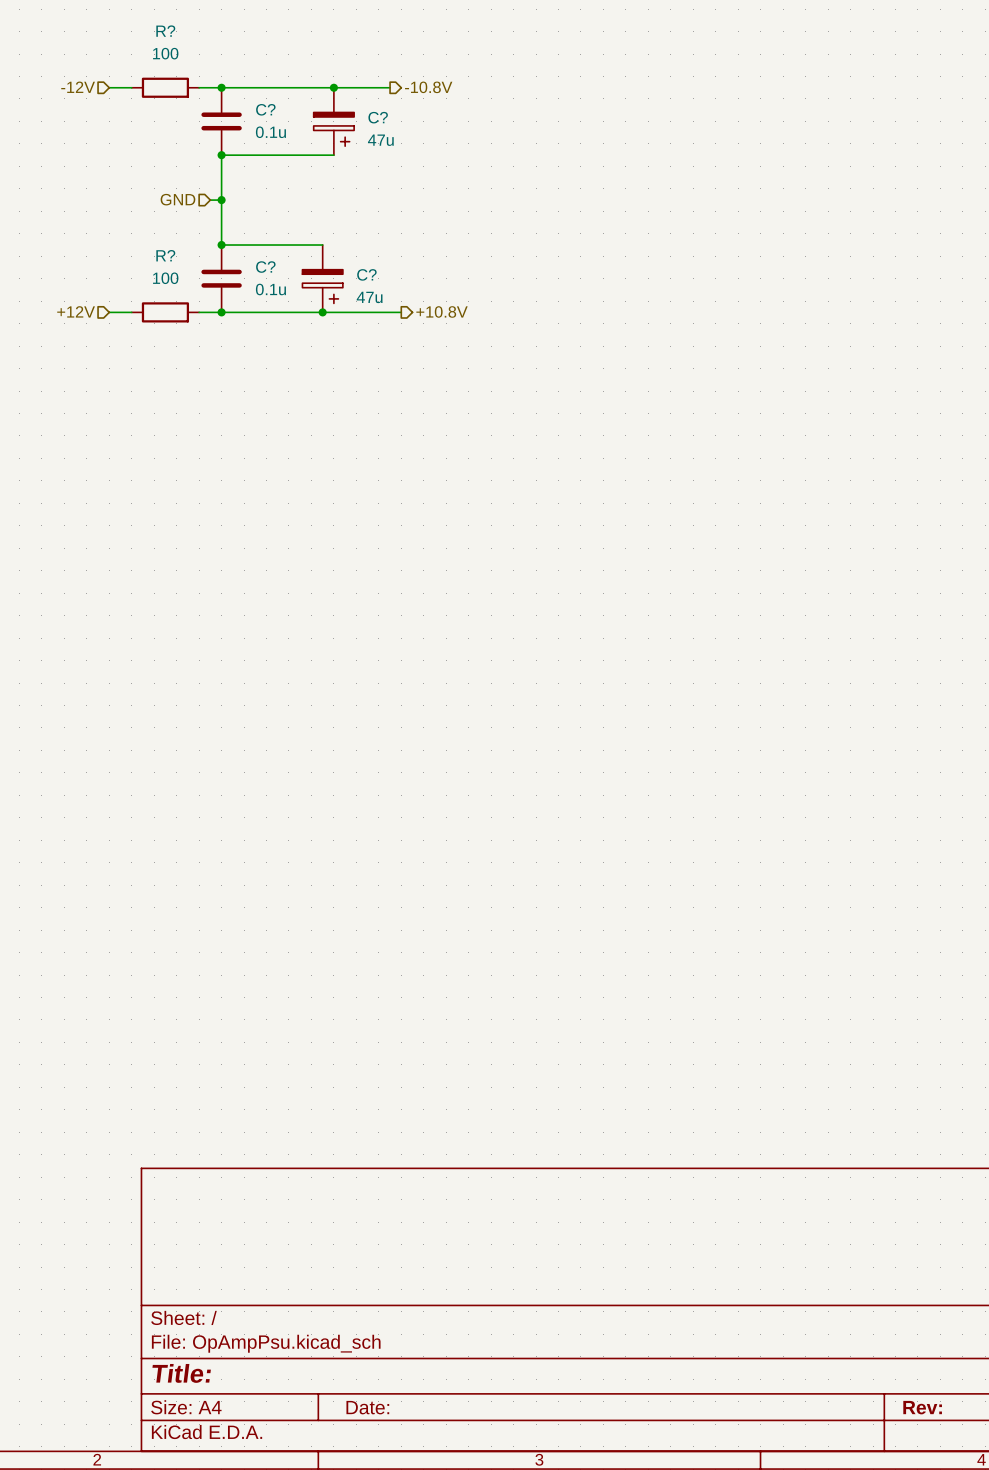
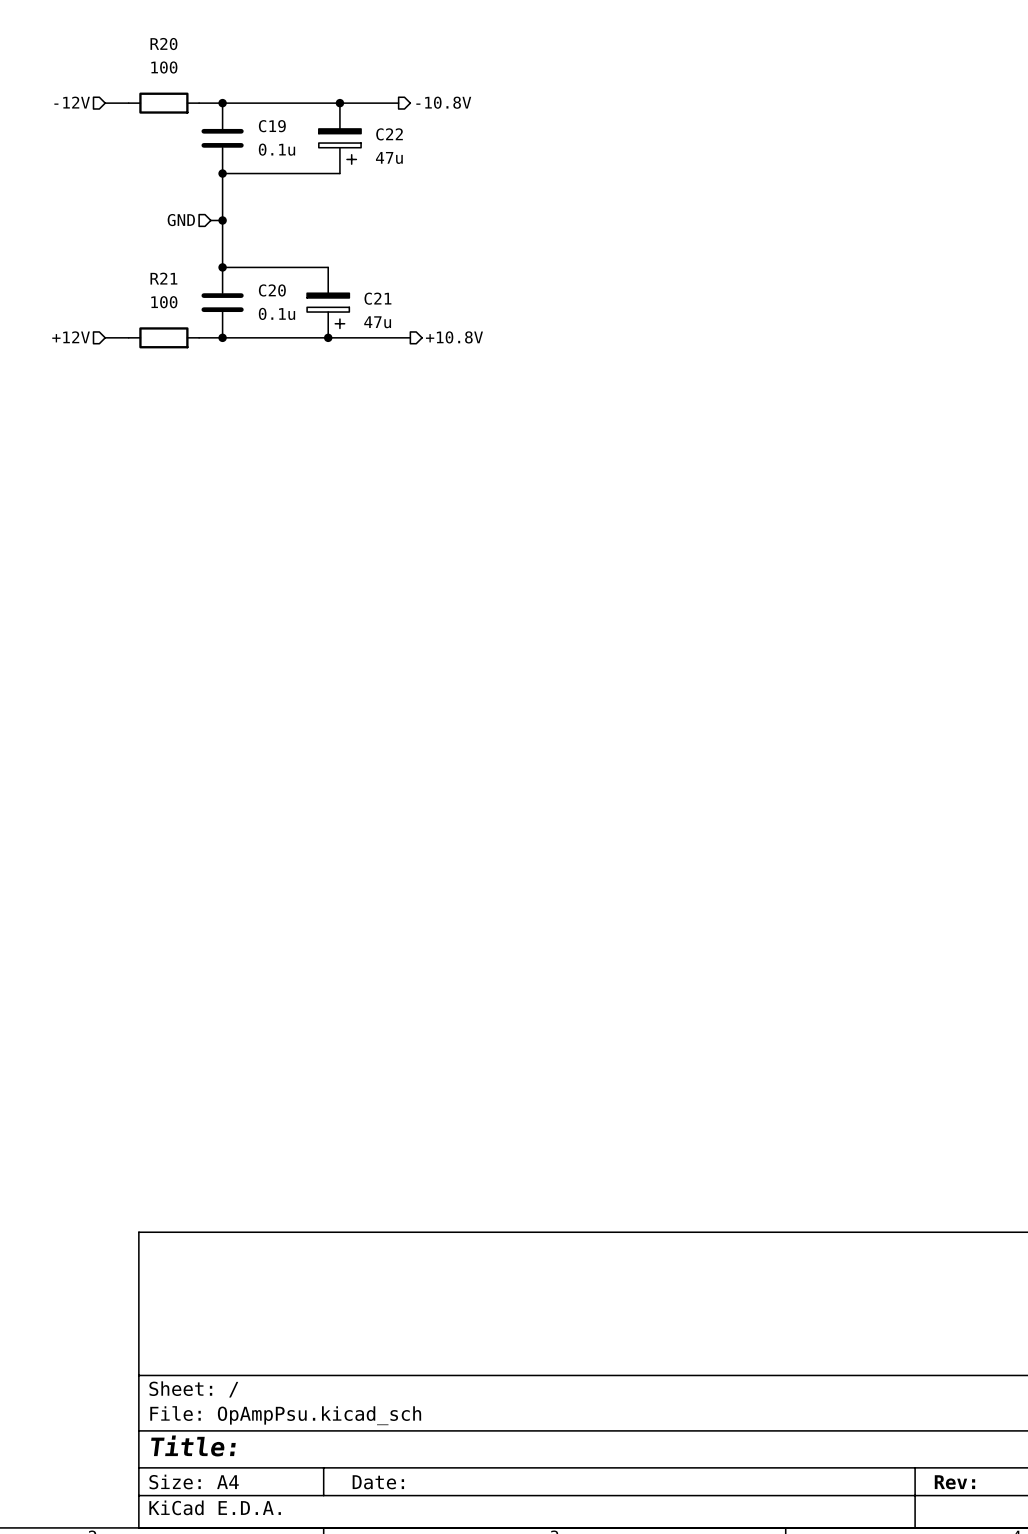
R? name: R? (165, 31) -> R20 (163, 44)
C? name: C? (265, 109) -> C19 (272, 126)
C? name: C? (378, 117) -> C22 (389, 134)
R? name: R? (165, 255) -> R21 (163, 278)
C? name: C? (265, 267) -> C20 (272, 290)
C? name: C? (366, 274) -> C21 (377, 298)

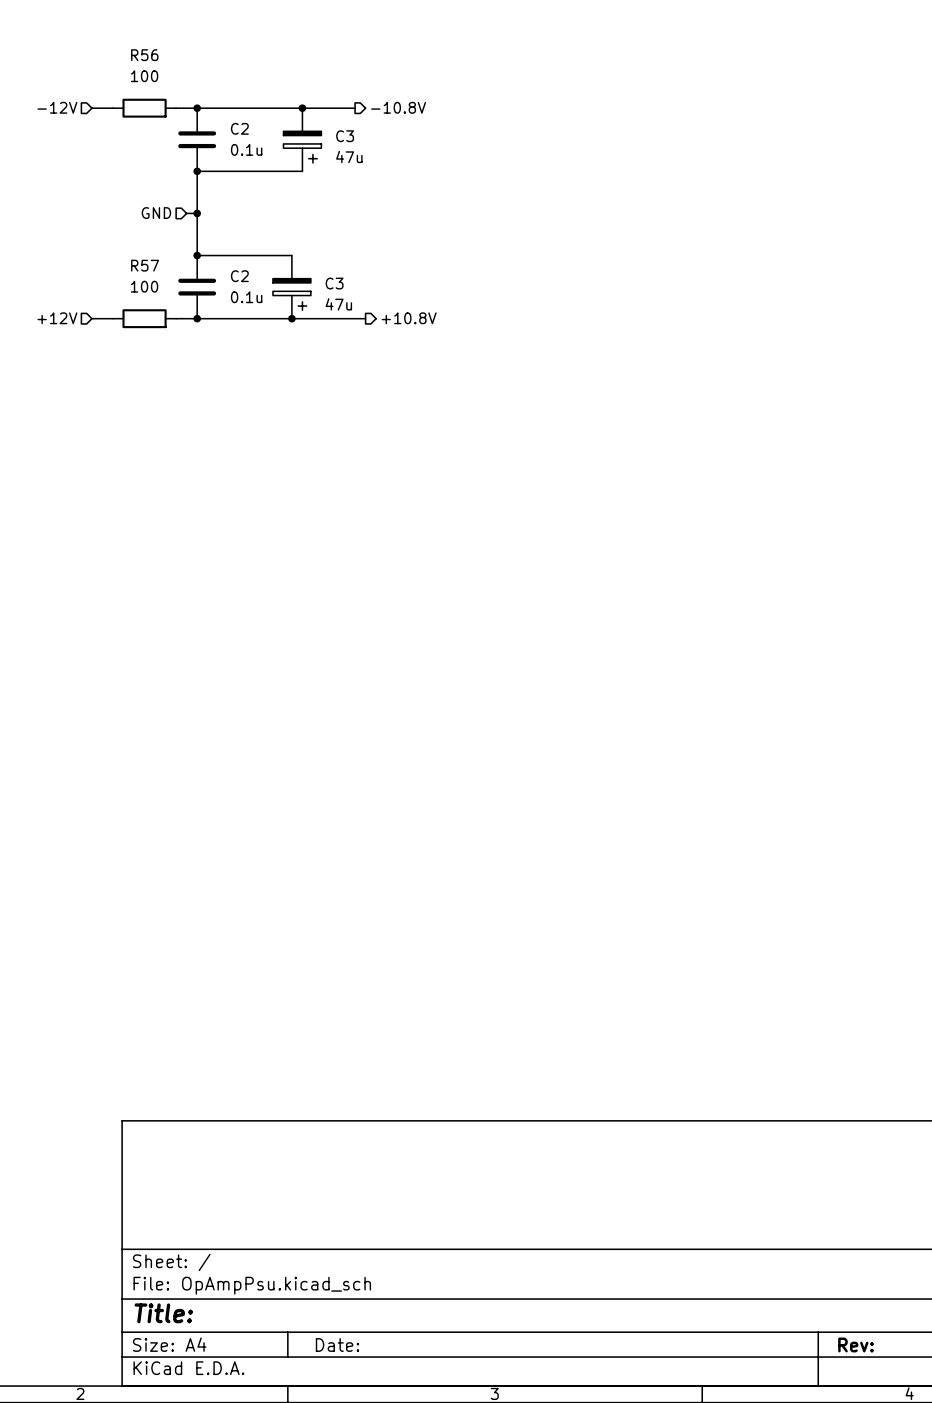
R20 name: R20 (163, 44) -> R56 (144, 55)
C19 name: C19 (272, 126) -> C2 (239, 128)
C22 name: C22 (389, 134) -> C3 (345, 136)
R21 name: R21 (163, 278) -> R57 (145, 265)
C20 name: C20 (272, 290) -> C2 (239, 276)
C21 name: C21 (377, 298) -> C3 (334, 283)

